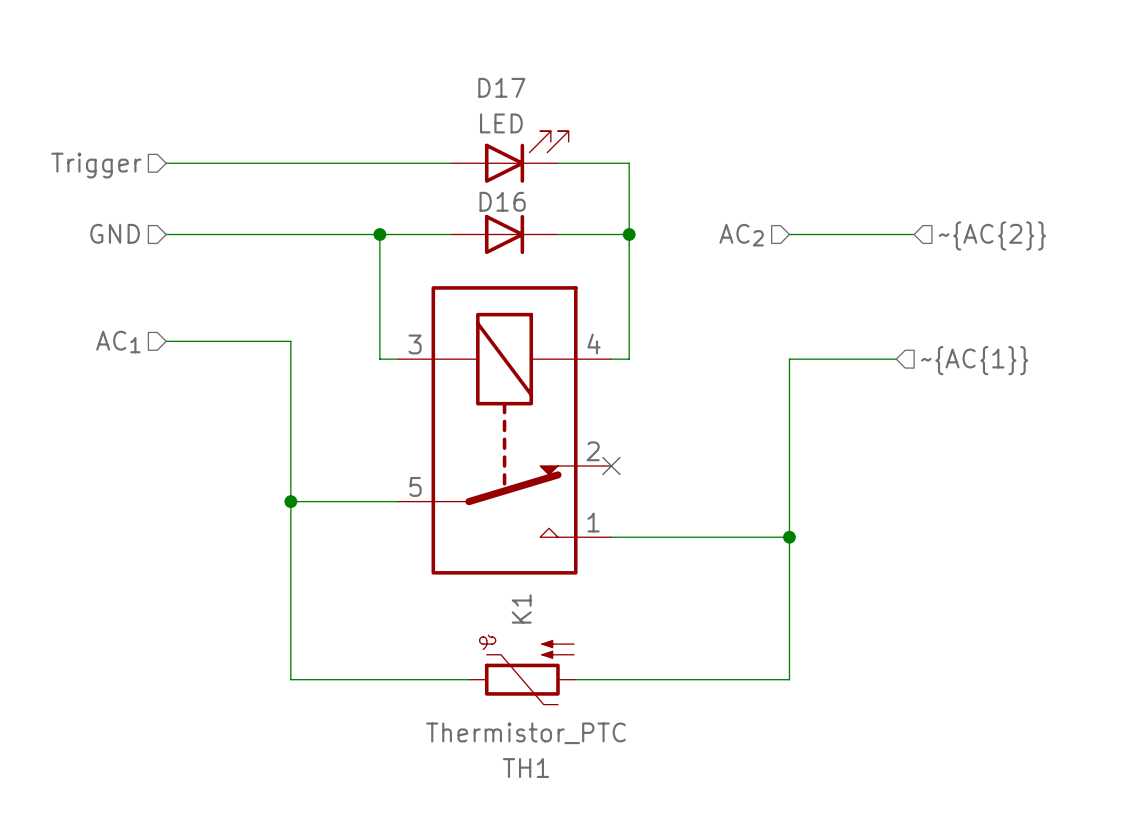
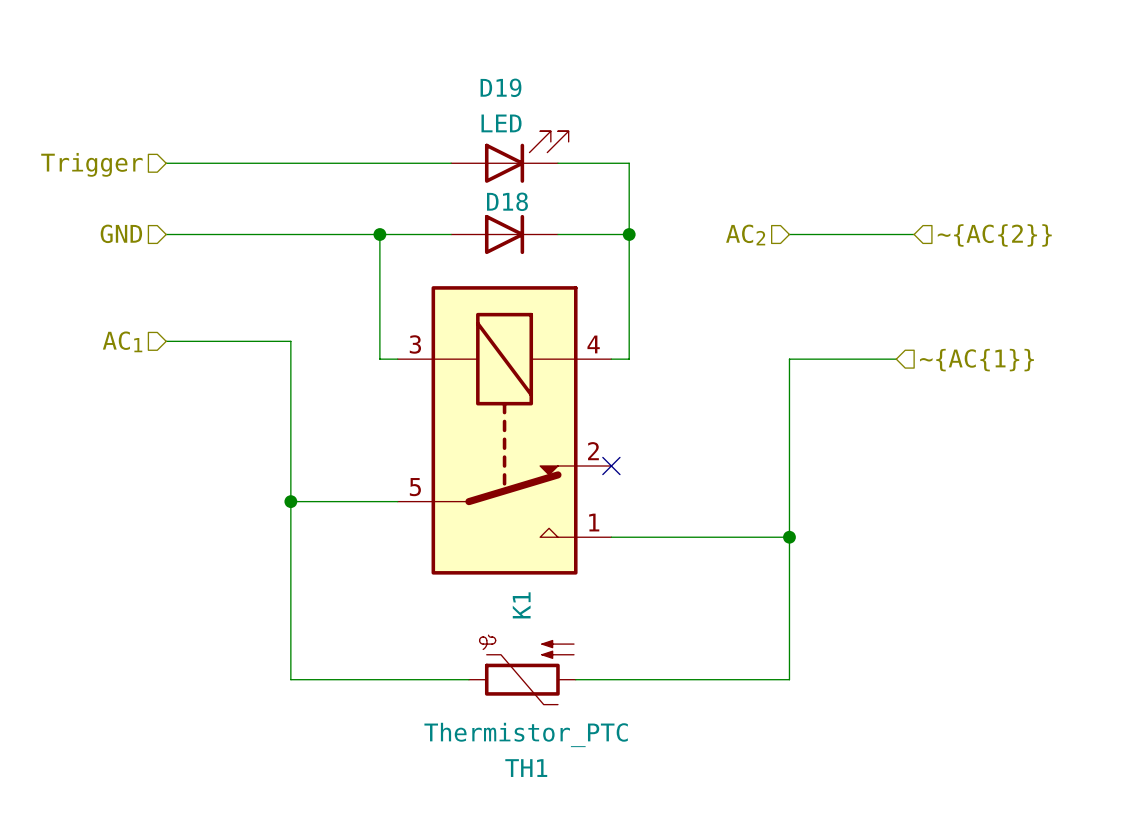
D17 name: D17 (501, 87) -> D19 (500, 87)
D16 name: D16 (502, 201) -> D18 (507, 201)

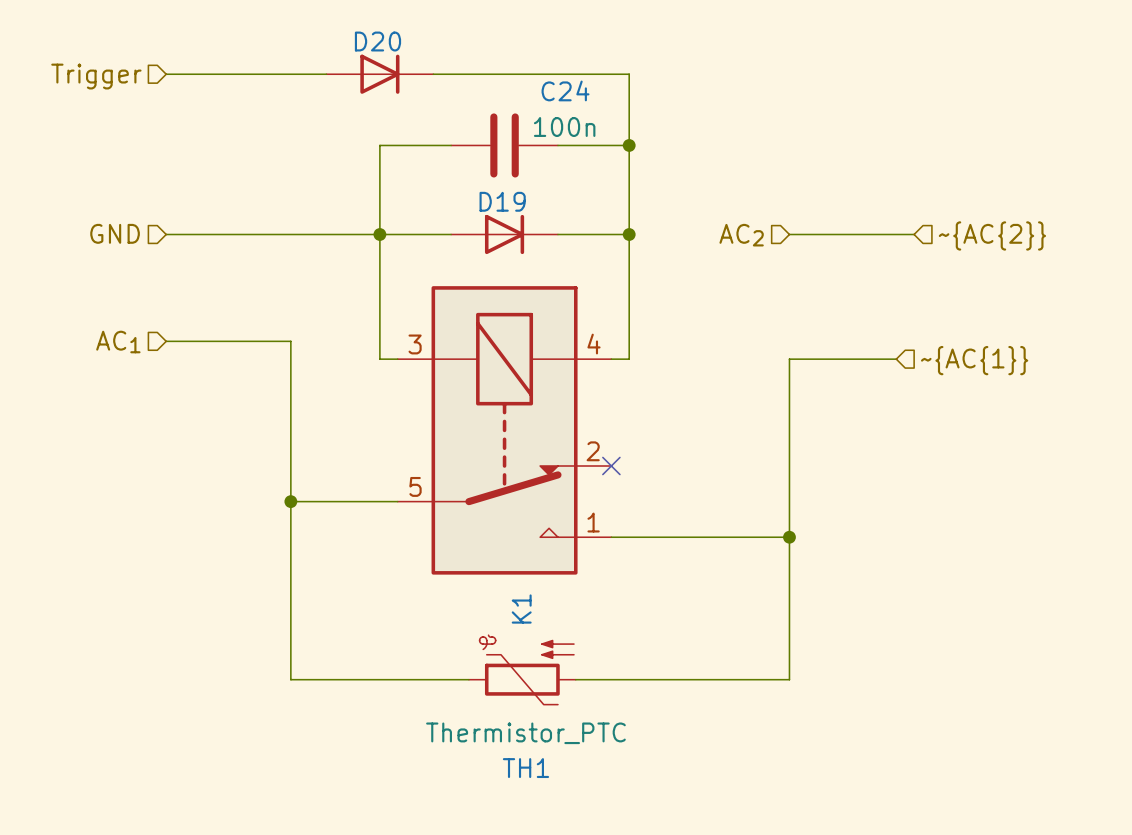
wire: none -> (166, 74) (326, 74)
D20: none -> (379, 74)
wire: none -> (451, 145) (379, 145) (379, 234)
C24: none -> 100n (504, 145)
wire: none -> (557, 145) (629, 145)
junction: none -> (629, 145)
D19: LED (509, 157) -> none
wire: (166, 163) (451, 163) -> none
wire: (557, 163) (629, 163) -> (433, 74) (629, 74) (629, 163)
hierarchical label position: Trigger (91, 164) -> Trigger (96, 76)
D18 name: D18 (507, 201) -> D19 (502, 201)

